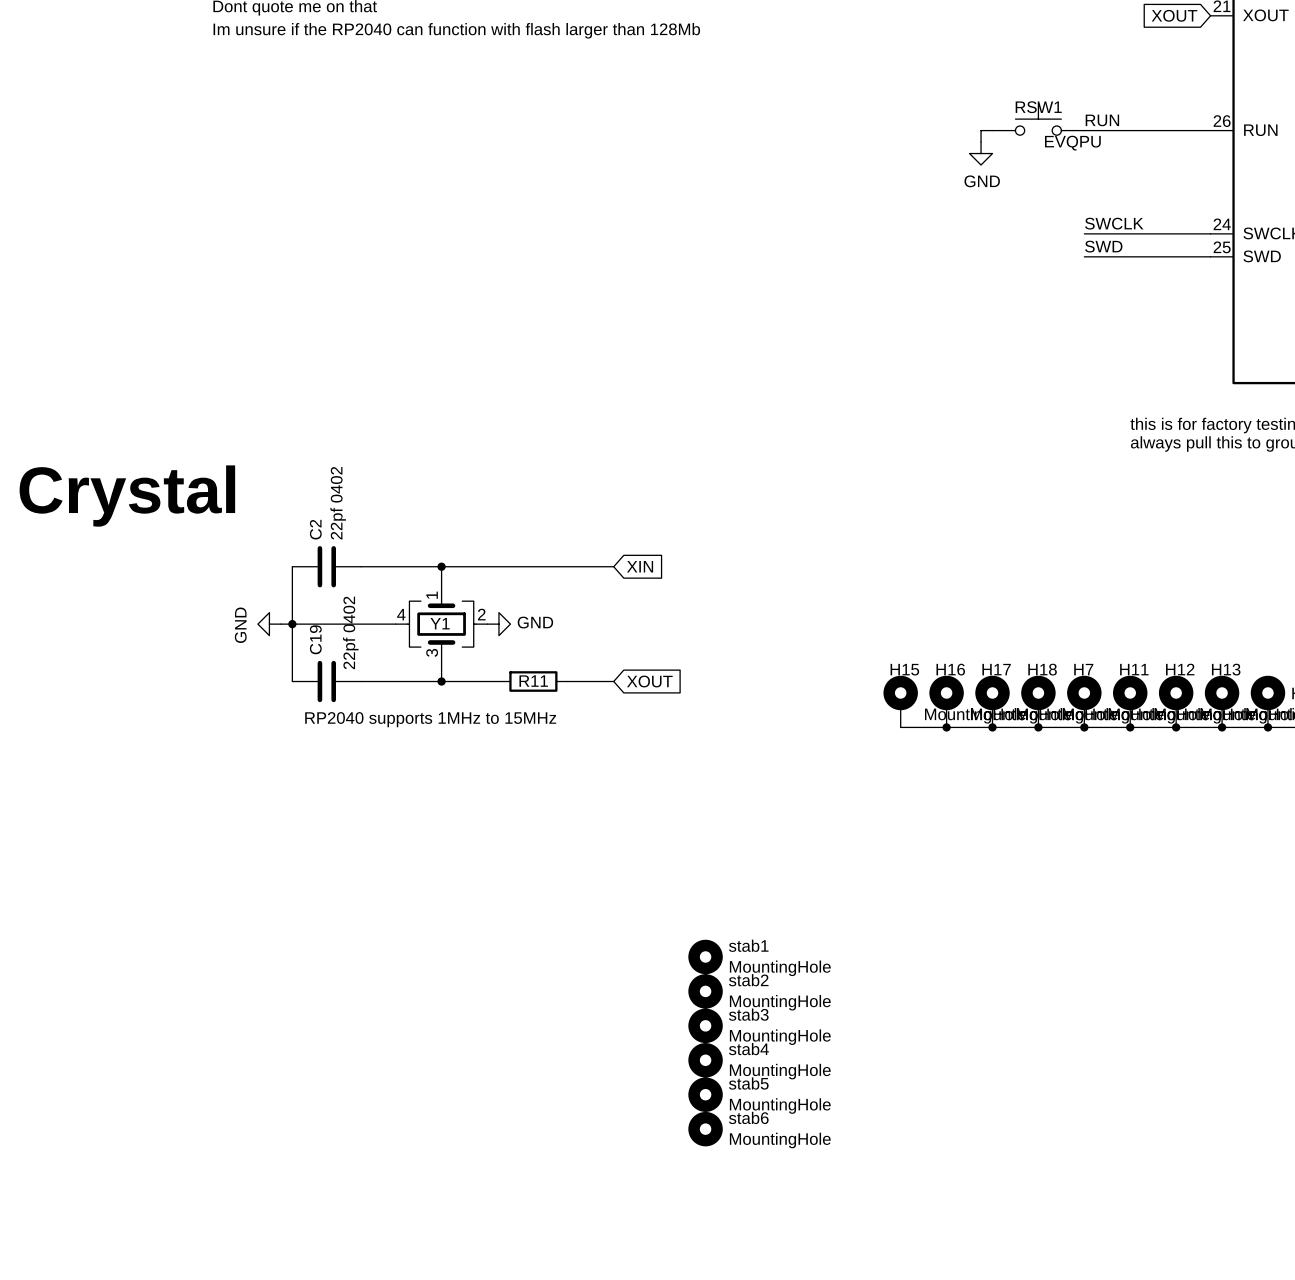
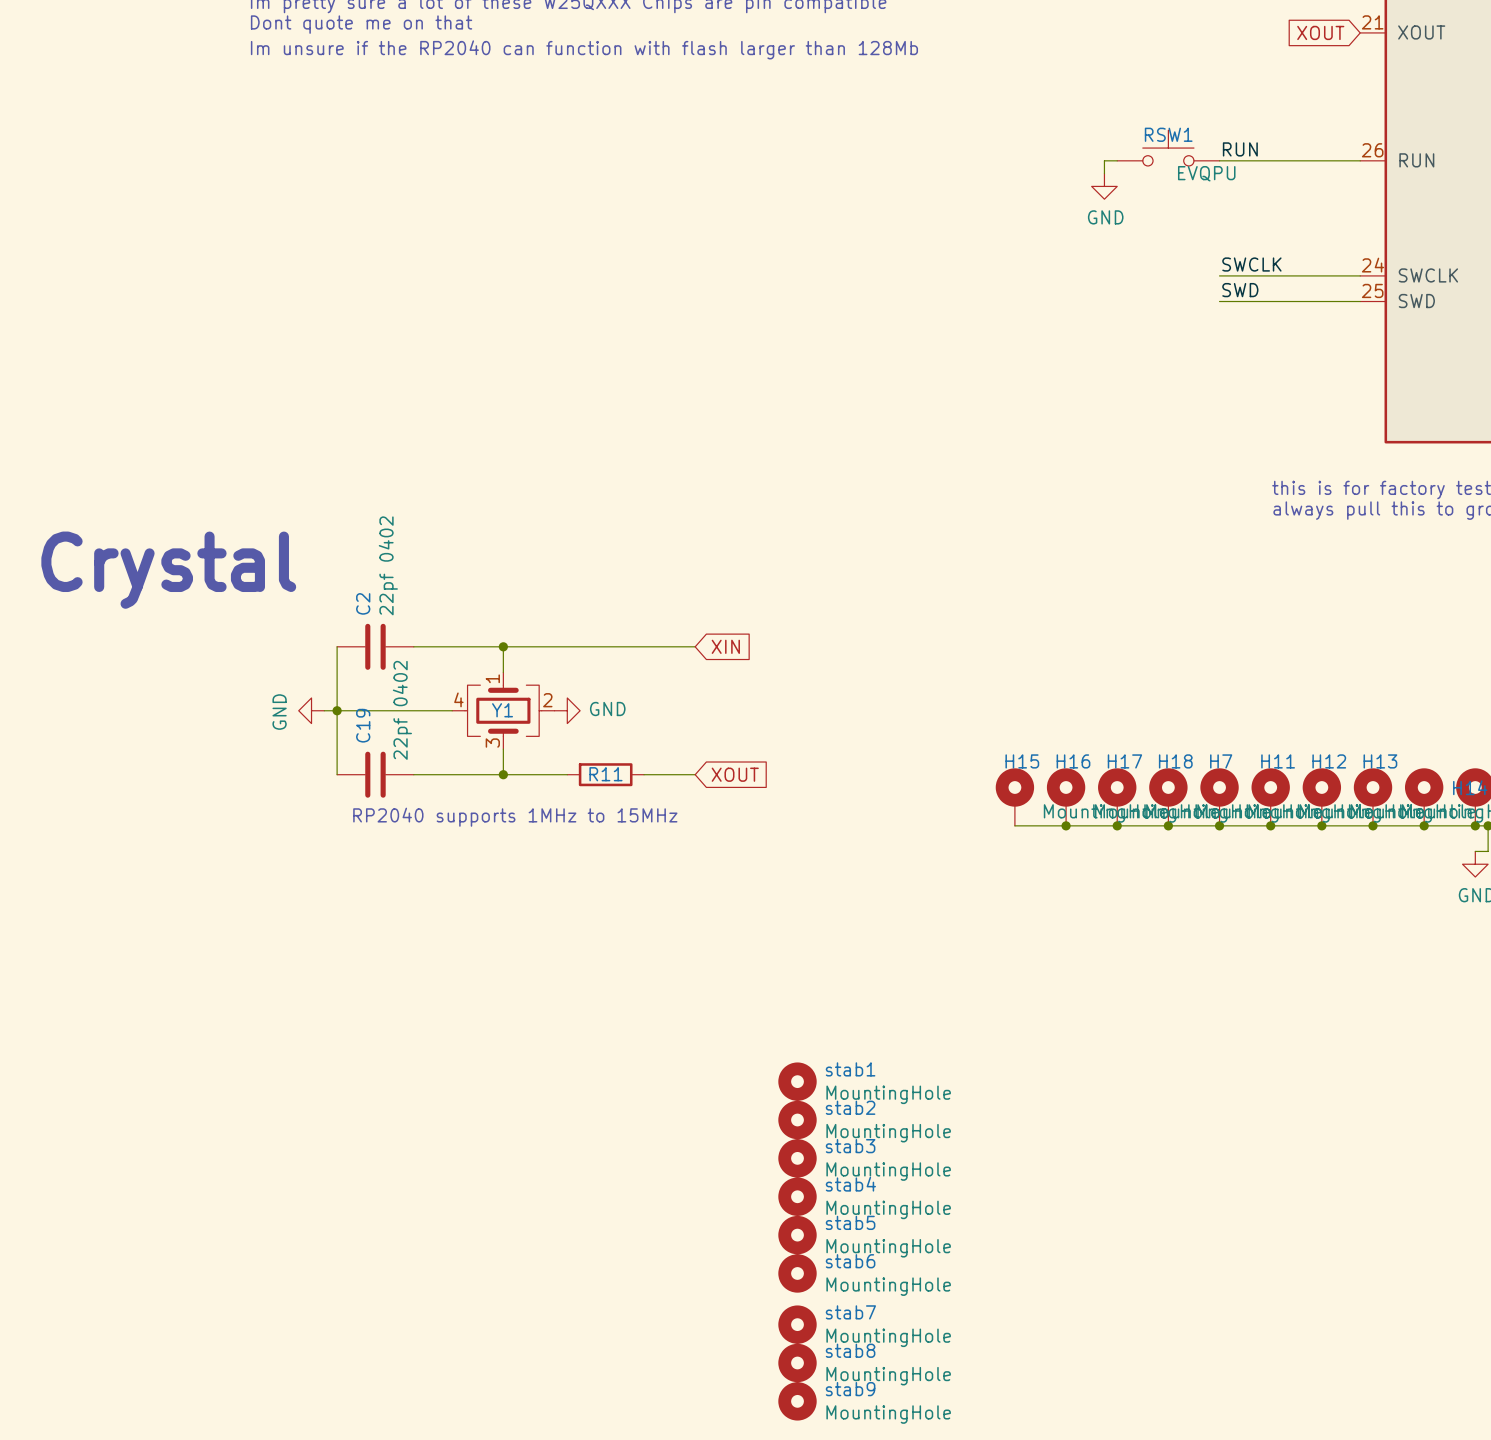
stab7: none -> MountingHole (797, 1324)
stab8: none -> MountingHole (797, 1362)
stab9: none -> MountingHole (797, 1401)

